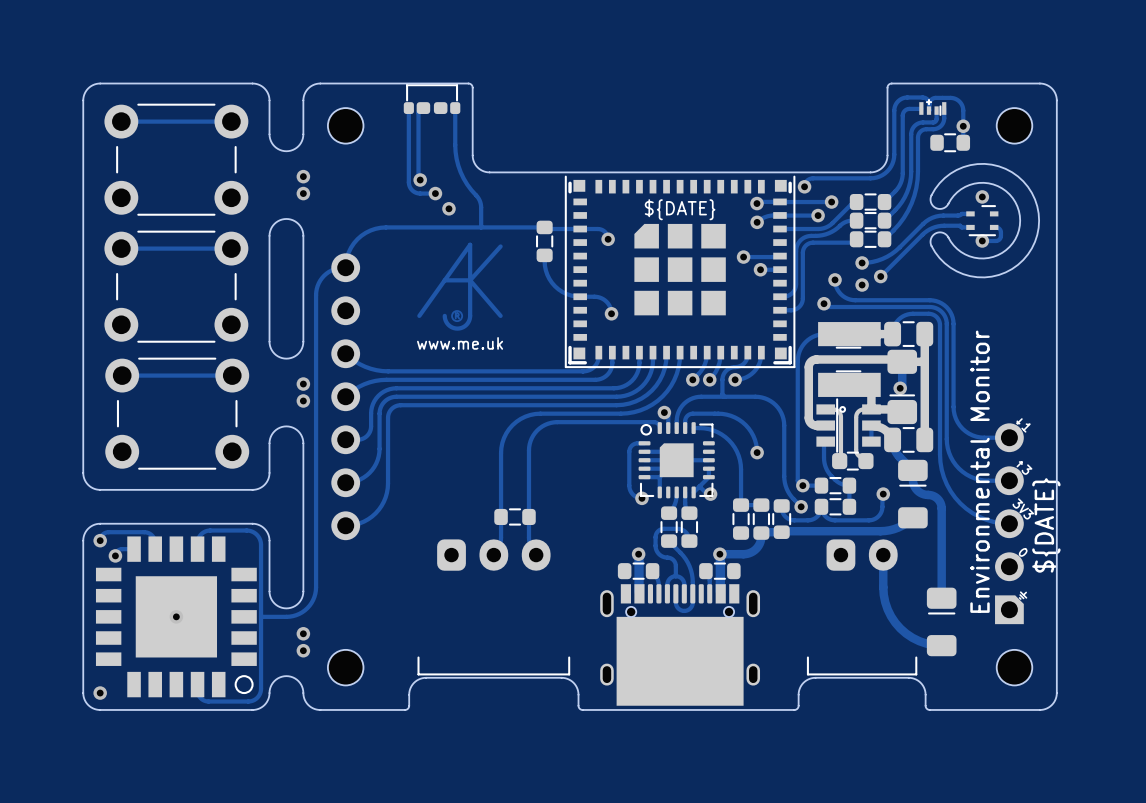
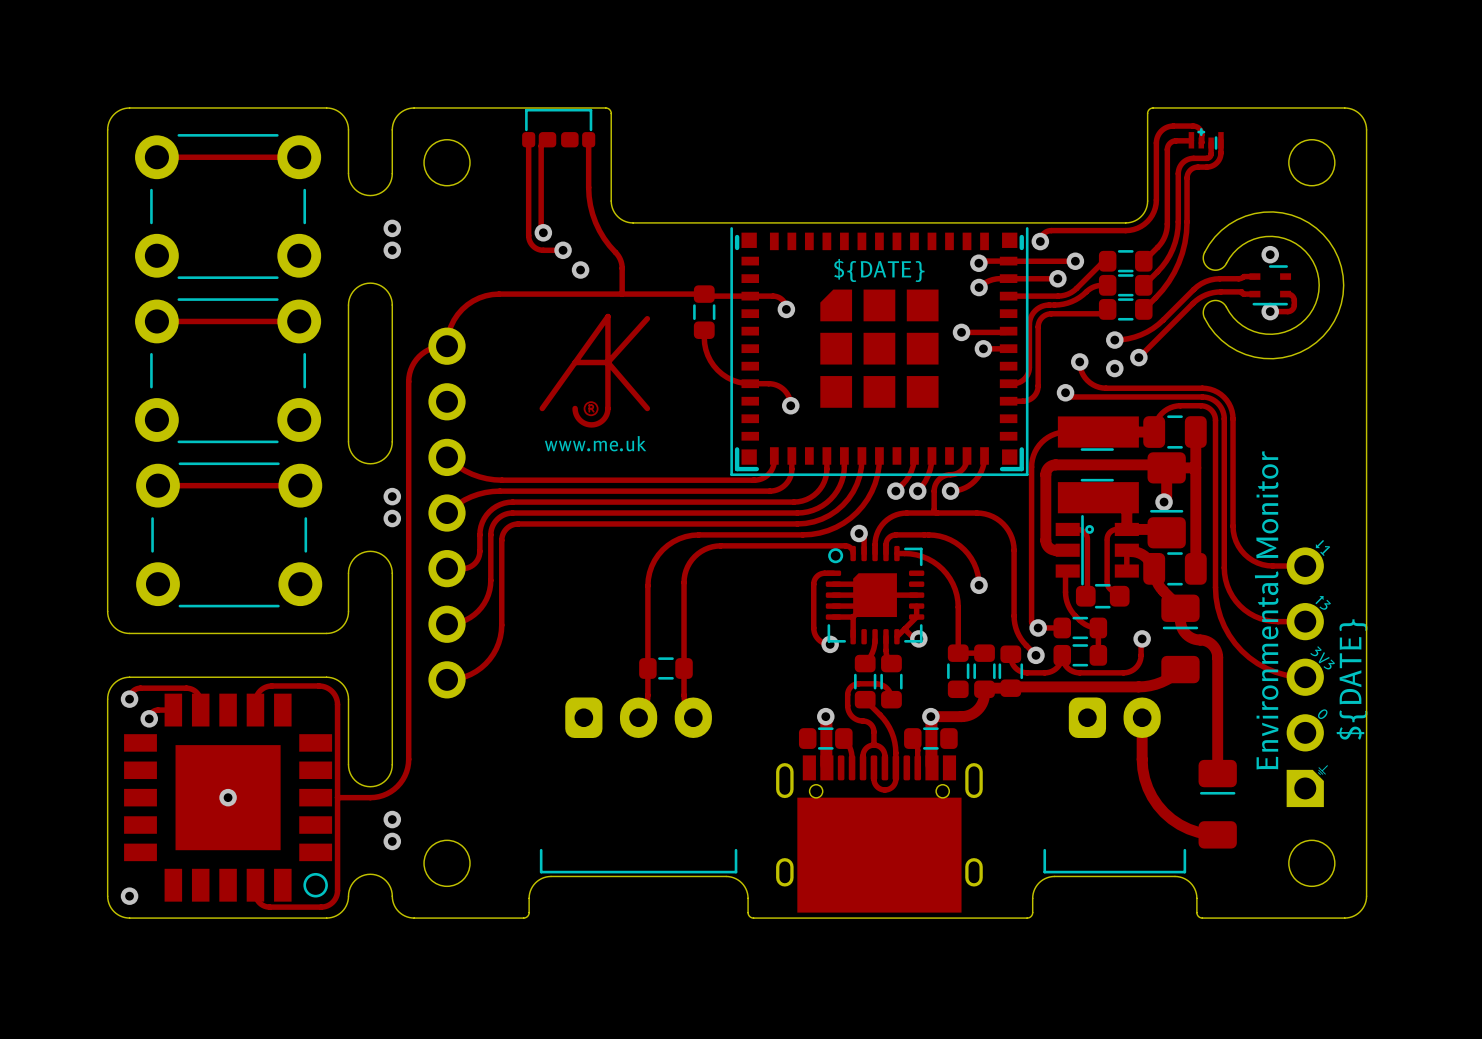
track: (929, 104) (930, 100) (934, 97) (952, 98) (959, 101) (963, 108) (963, 142) -> none
via: (963, 126) -> none
part: (950, 142) -> none

